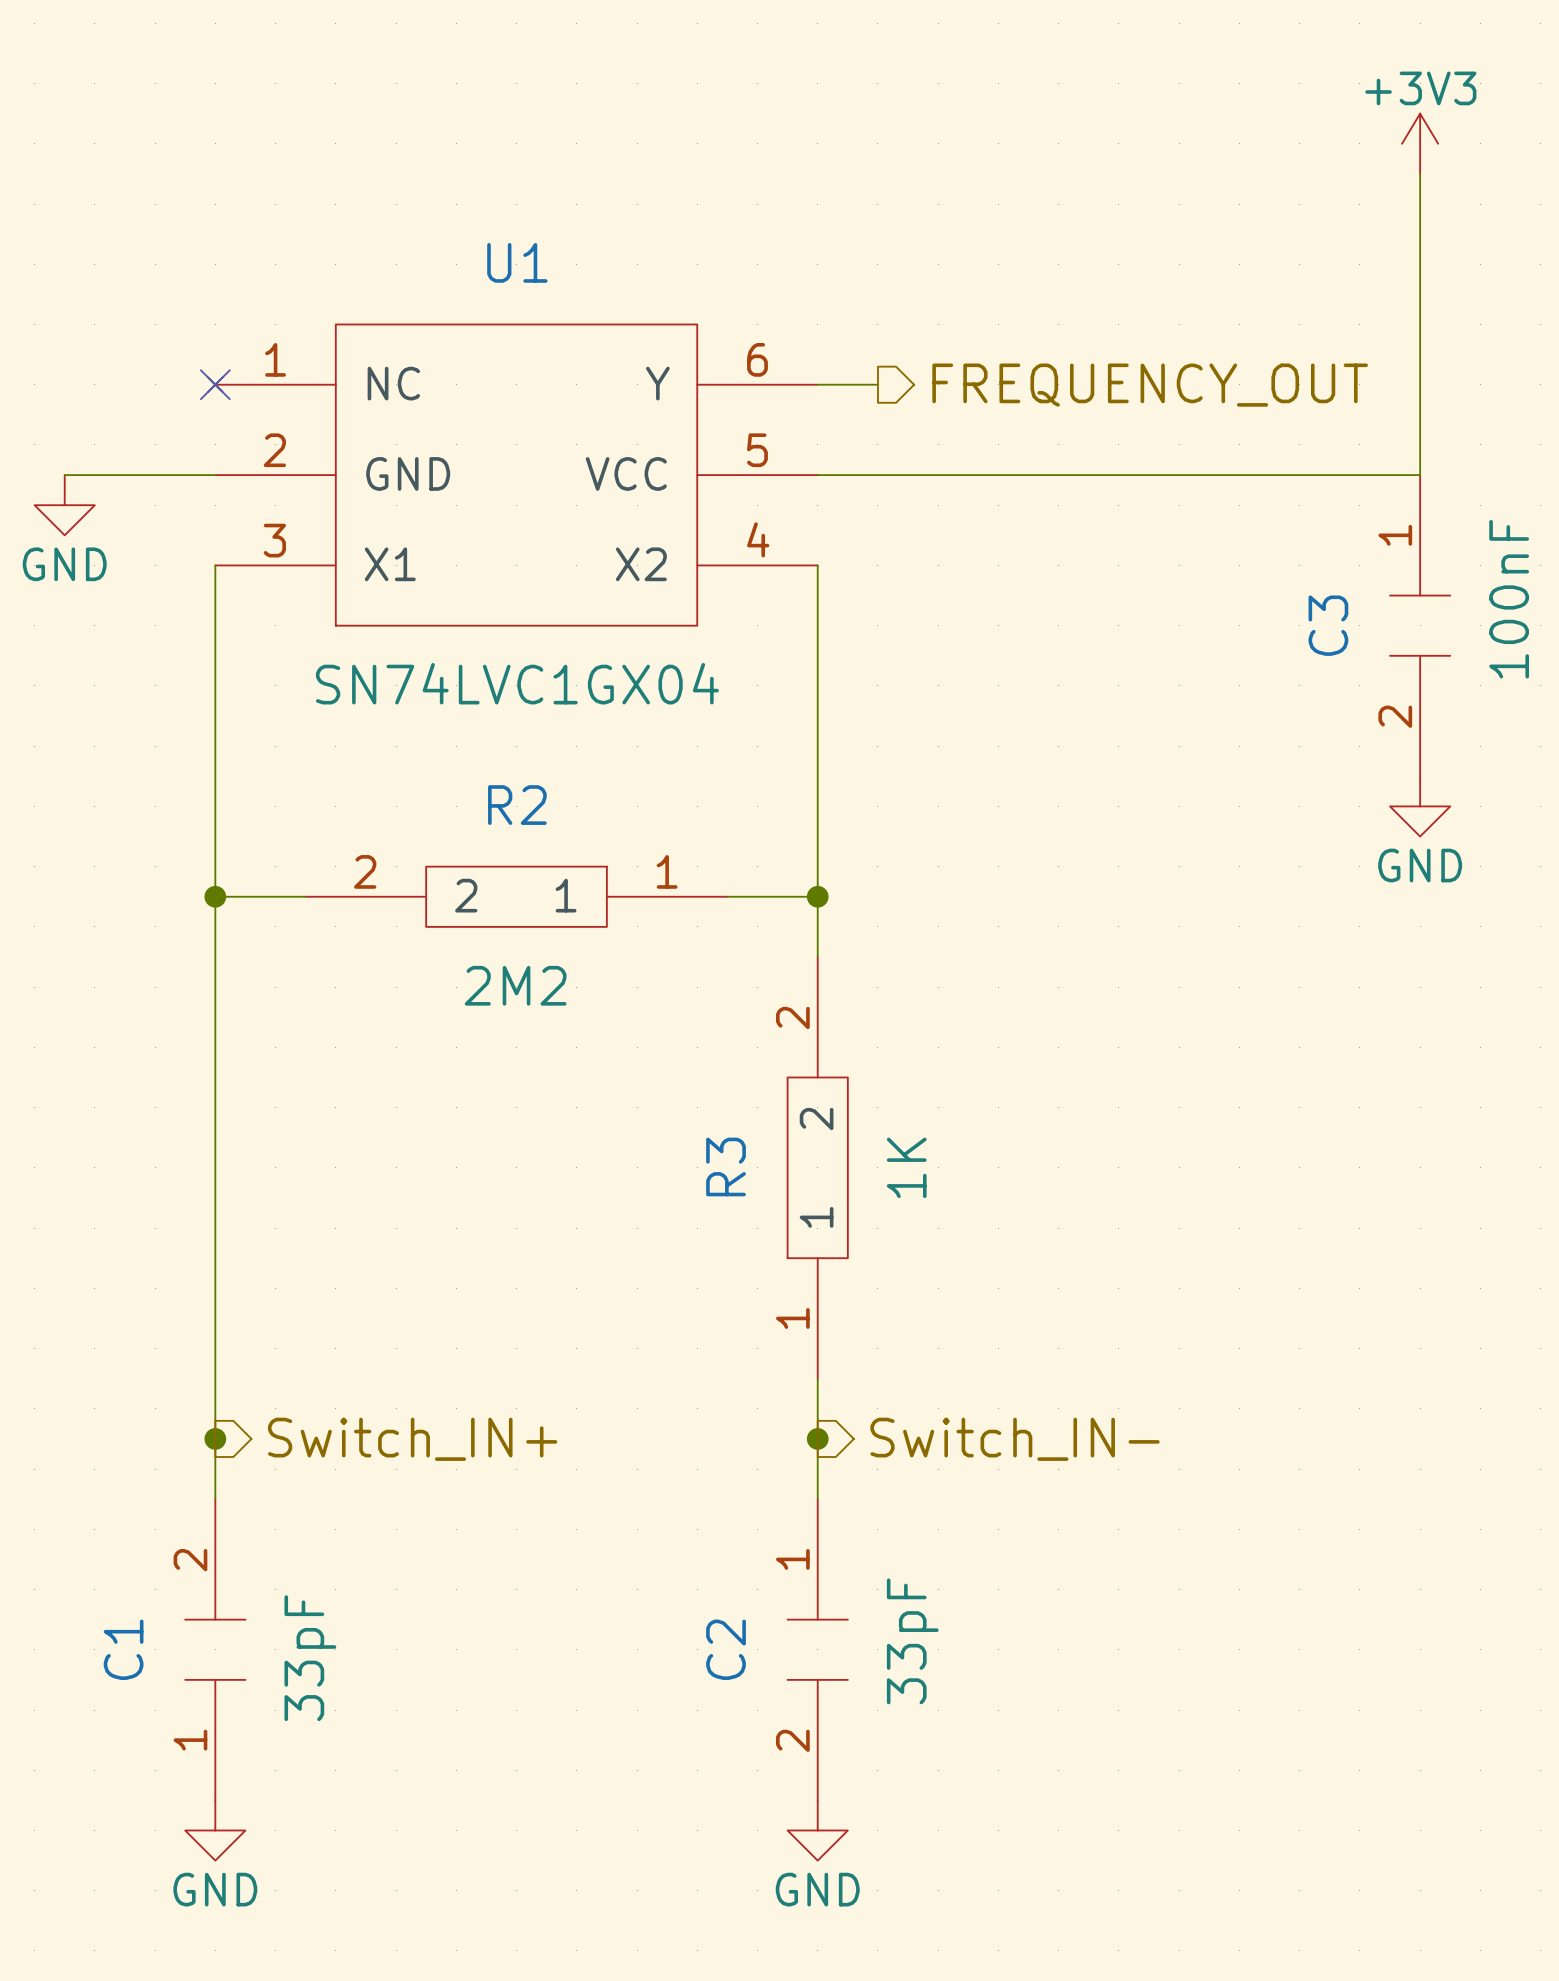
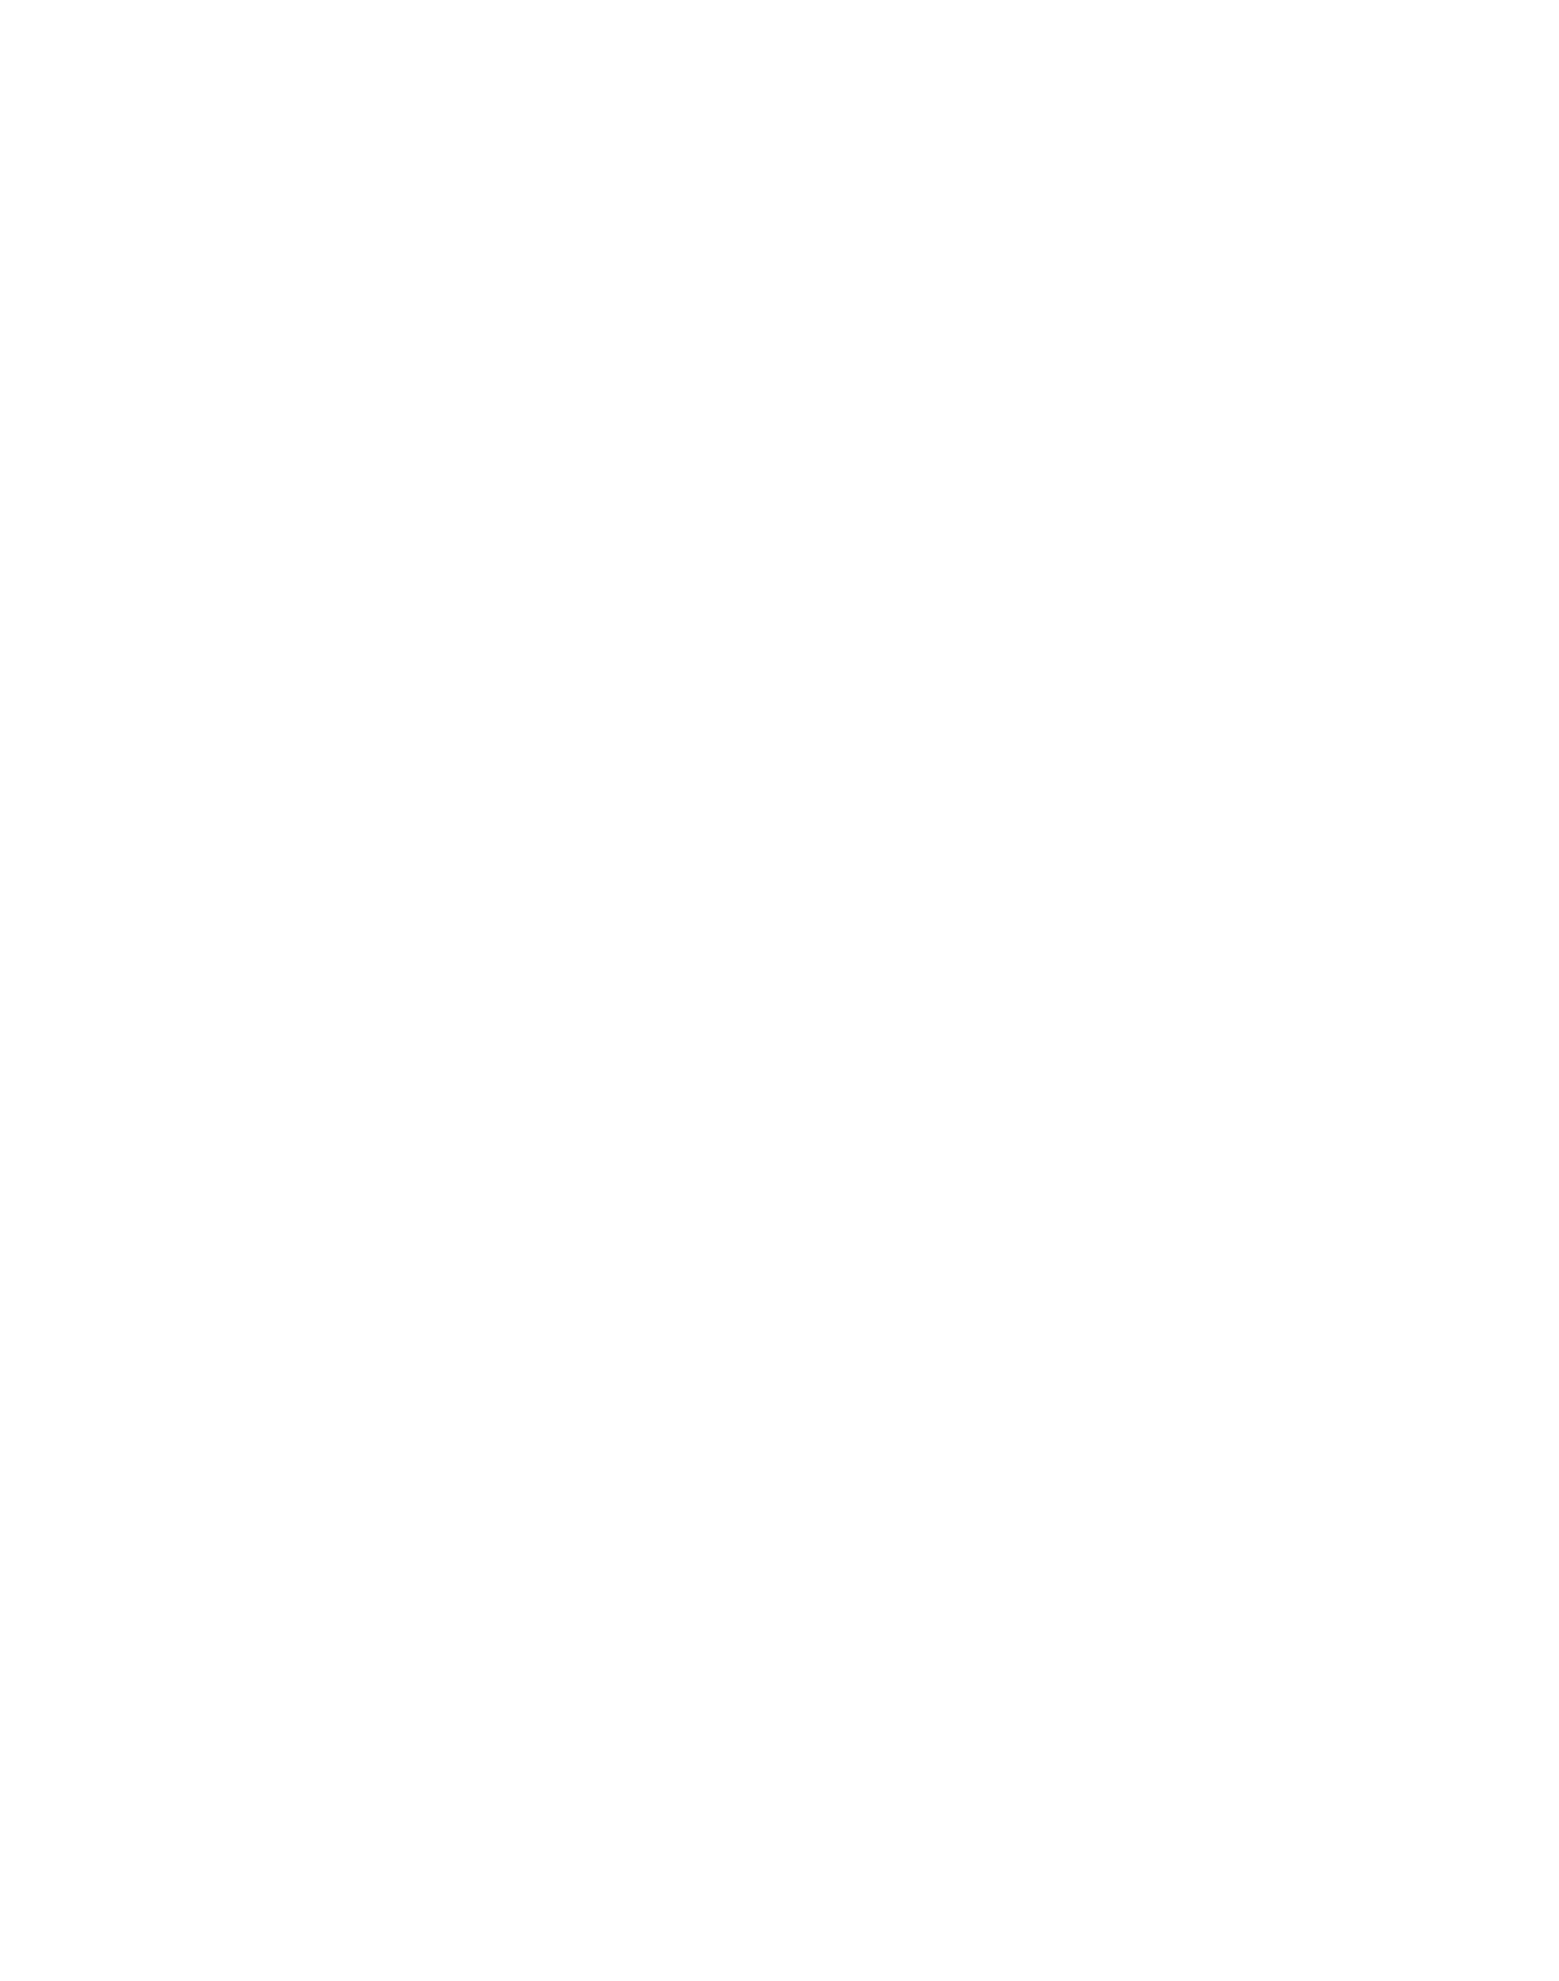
power symbol: +3V3 (1420, 143) -> none
wire: (1420, 173) (1420, 475) (817, 475) -> none
no-connect mark: (215, 384) -> none
wire: (817, 384) (877, 384) -> none
hierarchical label: FREQUENCY_OUT (1150, 385) -> none
wire: (64, 475) (215, 475) -> none
U1: SN74LVC1GX04 (512, 475) -> none
power symbol: GND (64, 505) -> none
wire: (215, 565) (215, 1499) -> none
wire: (817, 565) (817, 957) -> none
C3: 100nF (1420, 625) -> none
power symbol: GND (1420, 806) -> none
wire: (215, 896) (305, 896) -> none
junction: (215, 896) -> none
R2: 2M2 (516, 896) -> none
wire: (727, 896) (817, 896) -> none
junction: (817, 896) -> none
R3: 1K (817, 1167) -> none
wire: (817, 1378) (817, 1499) -> none
junction: (215, 1438) -> none
junction: (817, 1438) -> none
hierarchical label: Switch_IN+ (412, 1439) -> none
hierarchical label: Switch_IN- (1015, 1439) -> none
C1: 33pF (215, 1649) -> none
C2: 33pF (817, 1649) -> none
power symbol: GND (215, 1830) -> none
power symbol: GND (817, 1830) -> none

